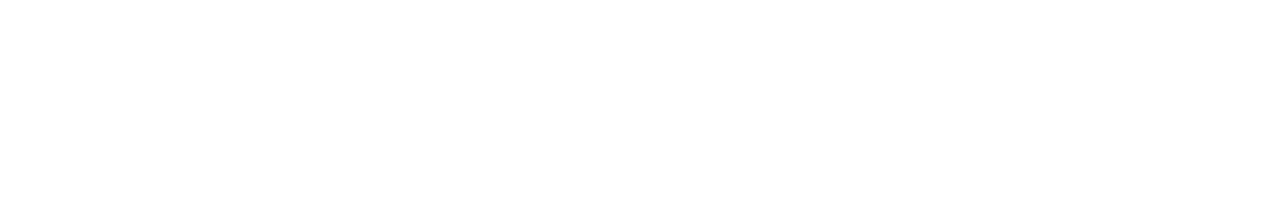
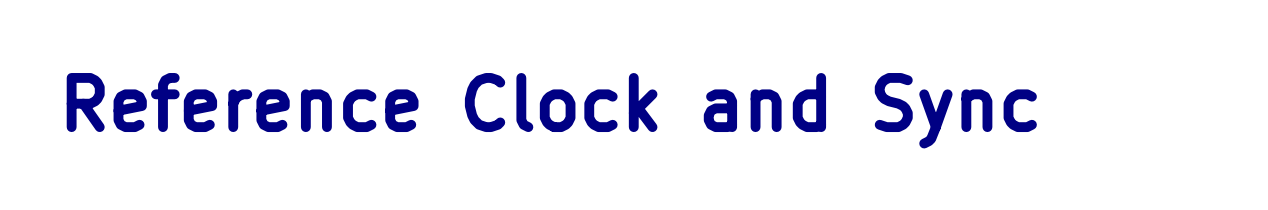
text: none -> Reference Clock and Sync (551, 110)

